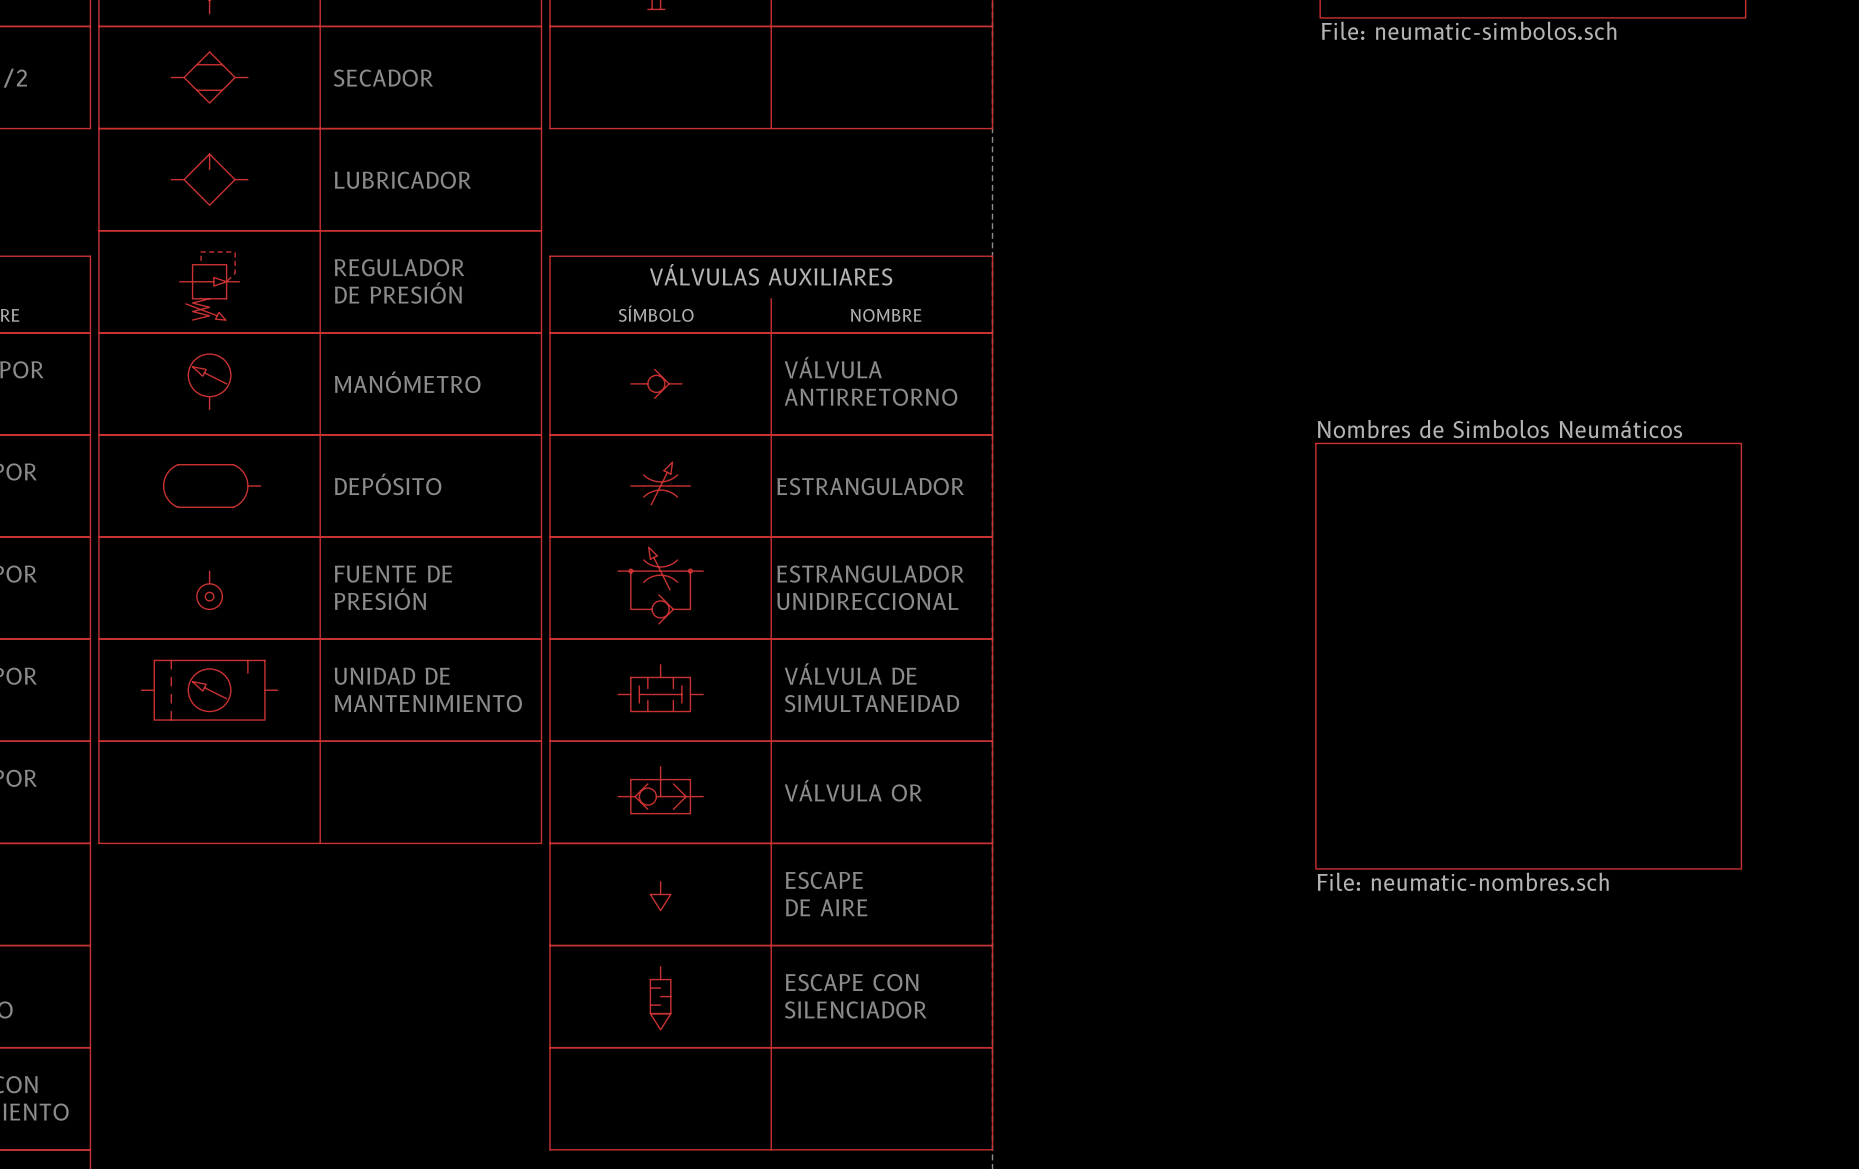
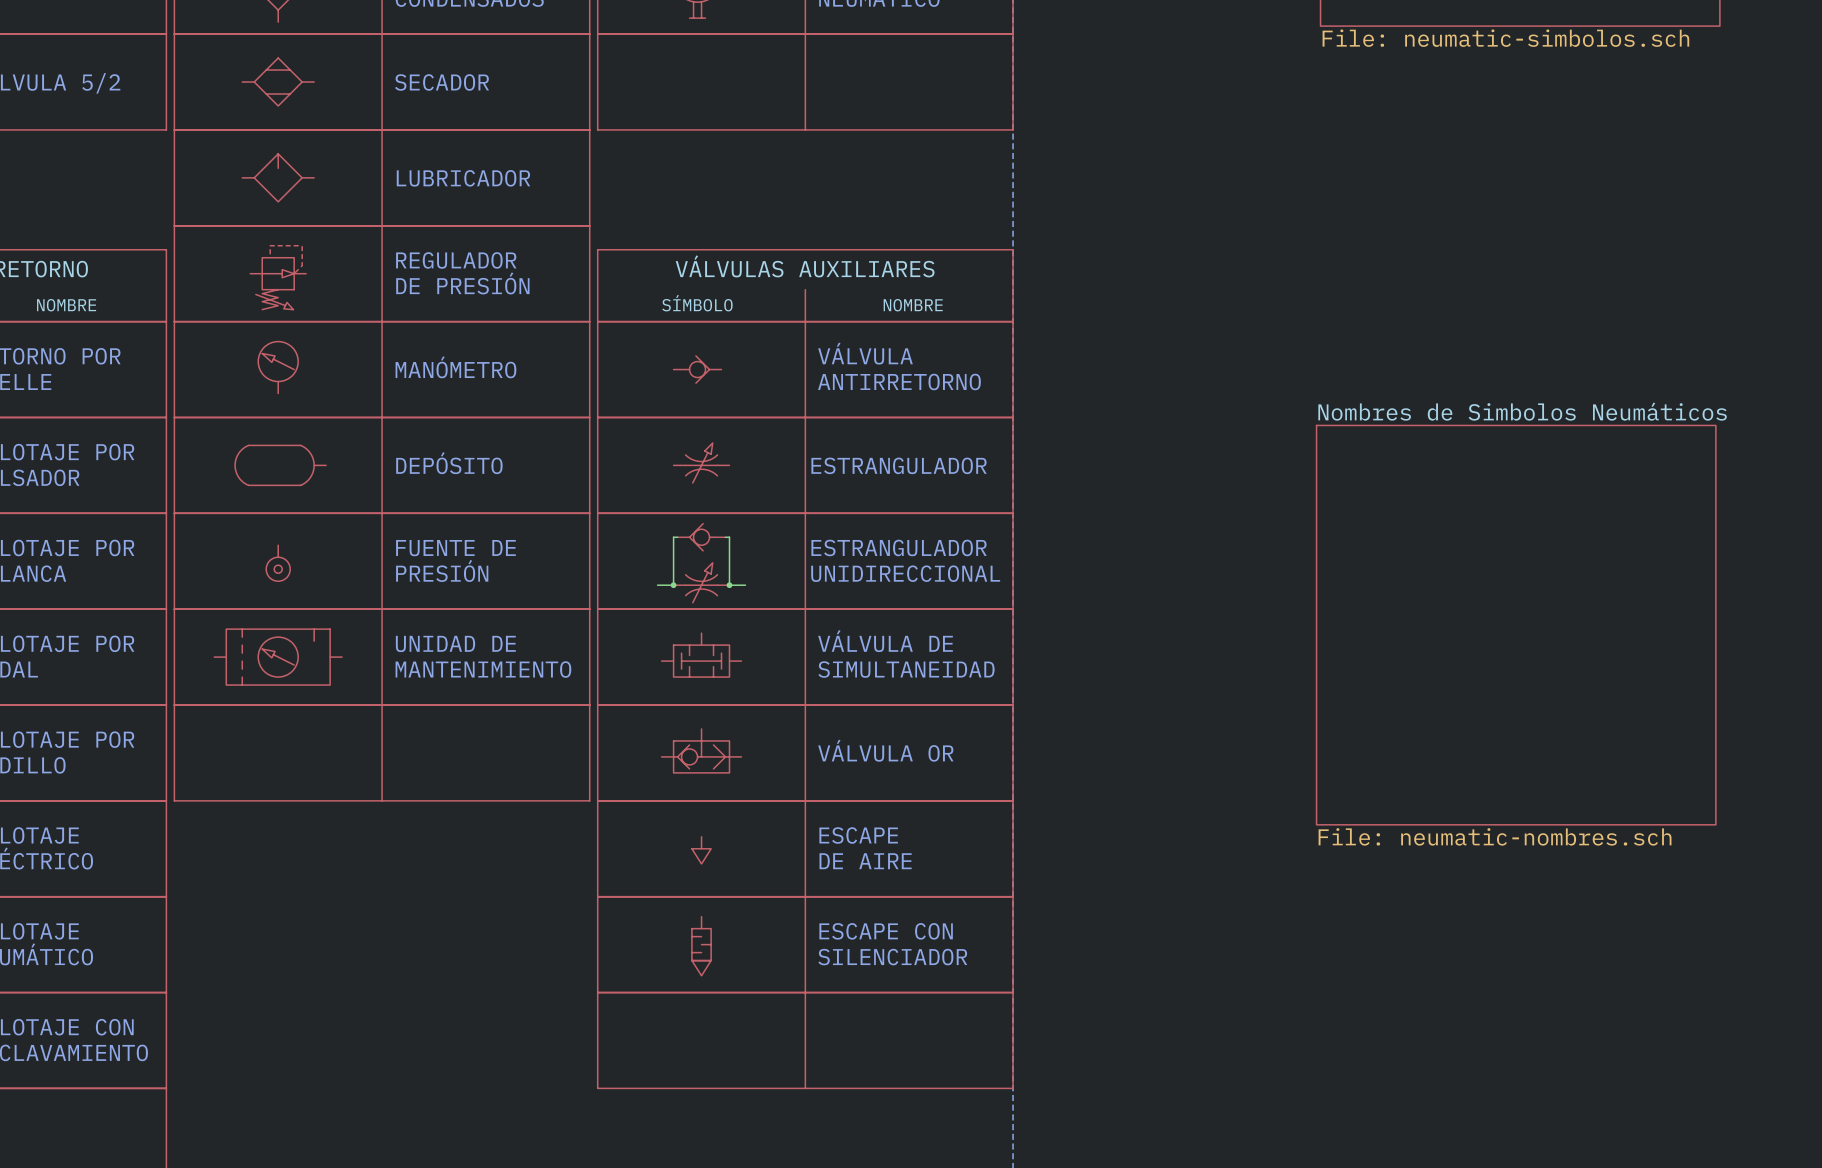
wire: none -> (677, 537) (673, 537) (673, 585) (657, 585)
part: none -> (701, 537)
wire: none -> (725, 537) (729, 537) (729, 585) (745, 585)
part: (660, 585) -> none
part: none -> (701, 582)
junction: none -> (673, 585)
junction: none -> (729, 585)

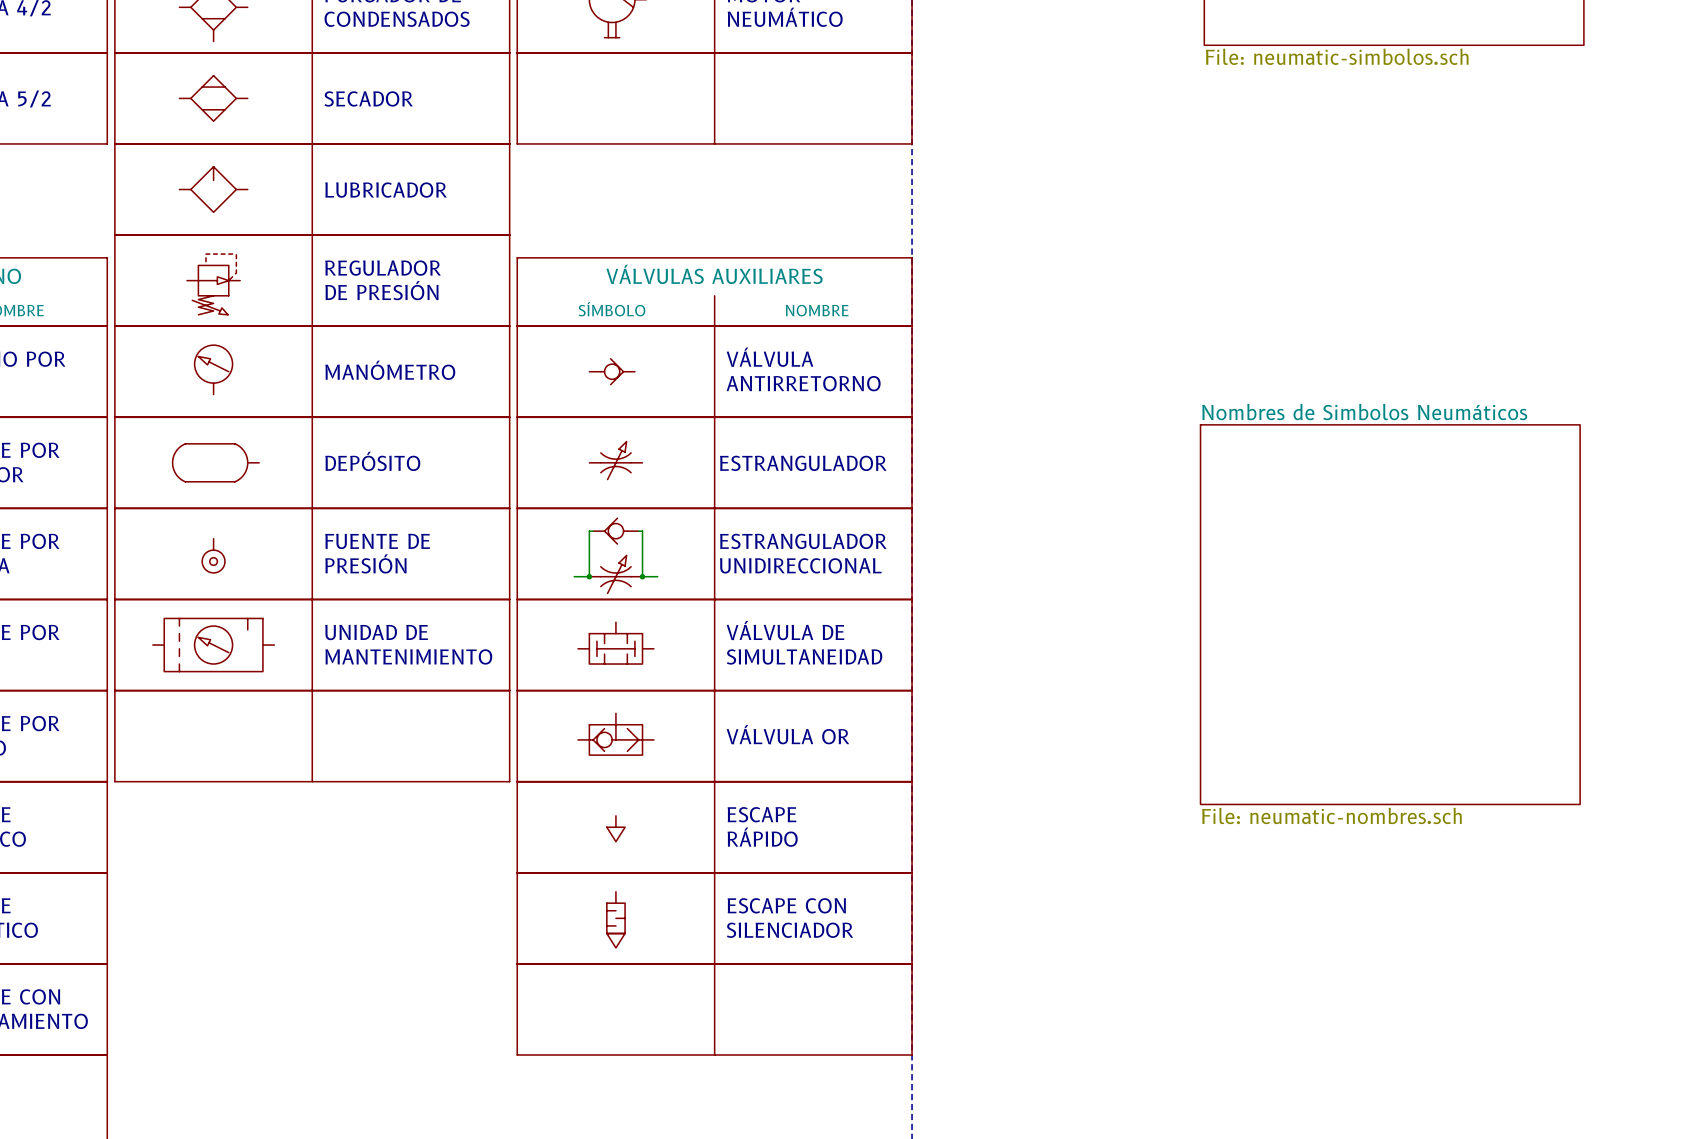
text: DE AIRE (865, 861) -> RÁPIDO (762, 837)

